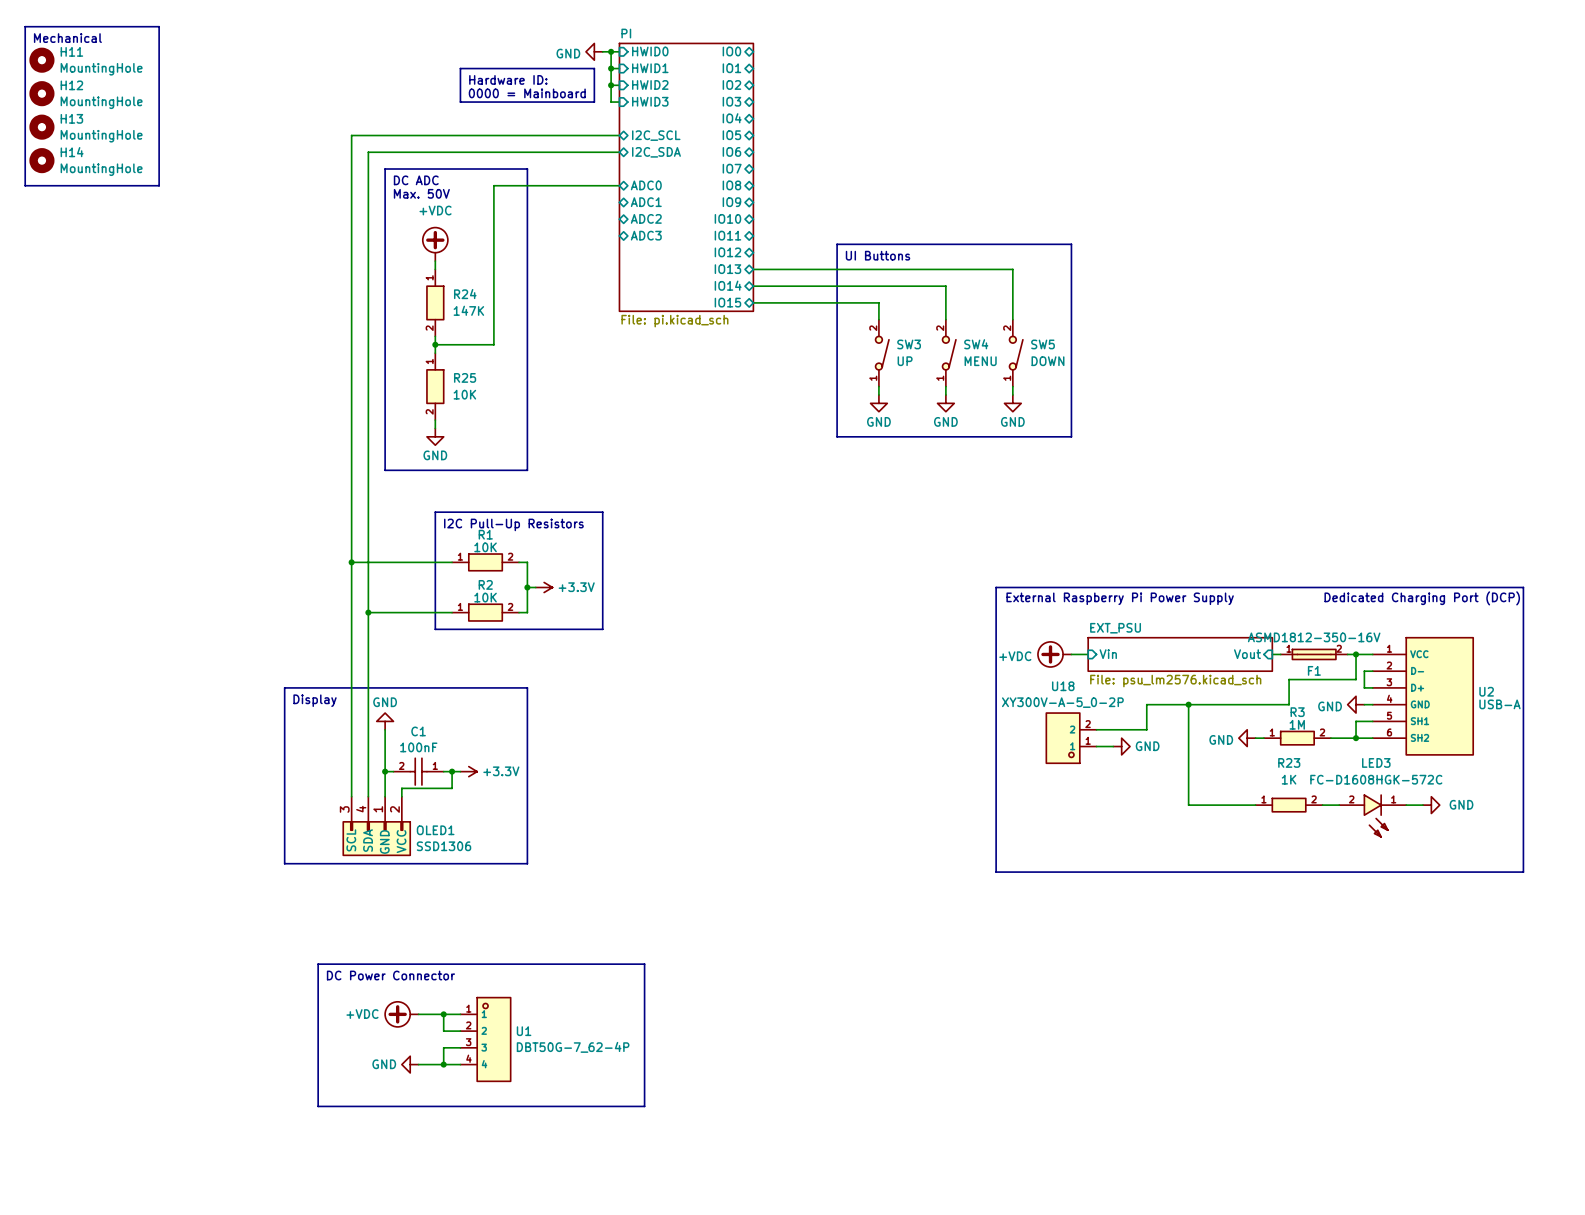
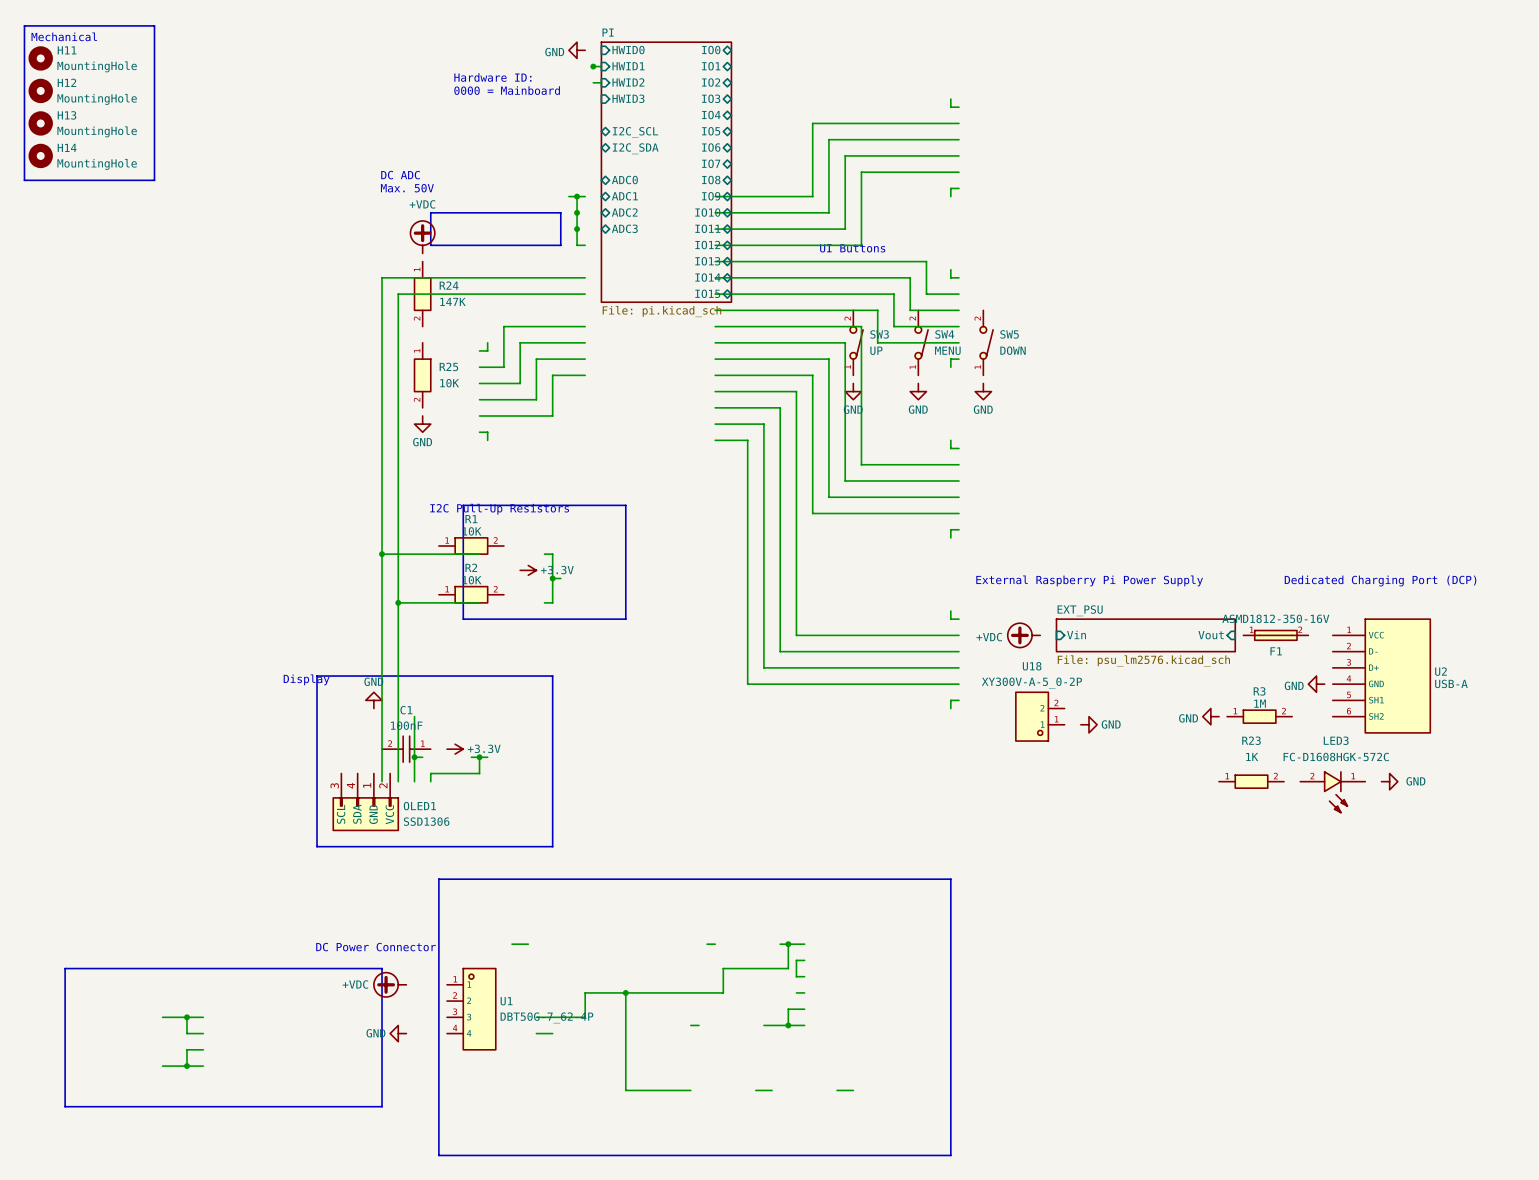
wire: (602, 51) (619, 51) -> (568, 196) (585, 196)
wire: (611, 51) (611, 102) (619, 102) -> (577, 196) (577, 245) (585, 245)
junction: (611, 51) -> none
line: (460, 68) (594, 68) (594, 102) (460, 102) (460, 68) -> (430, 212) (560, 212) (560, 245) (430, 245) (430, 212)
junction: (611, 85) -> none
wire: none -> (950, 99) (950, 107) (958, 107)
wire: none -> (958, 123) (812, 123) (812, 196) (715, 196)
wire: (619, 135) (351, 135) (351, 796) -> none
wire: none -> (958, 139) (828, 139) (828, 212) (715, 212)
wire: (619, 152) (368, 152) (368, 796) -> none
wire: none -> (958, 155) (845, 155) (845, 229) (715, 229)
line: (385, 169) (527, 169) (527, 470) (385, 470) (385, 169) -> none
wire: none -> (958, 172) (861, 172) (861, 245) (715, 245)
wire: (619, 185) (493, 185) (493, 344) (435, 344) -> none
wire: none -> (958, 188) (950, 188) (950, 196)
junction: none -> (577, 196)
junction: none -> (577, 212)
junction: none -> (577, 229)
line: (837, 244) (1071, 244) (1071, 436) (837, 436) (837, 244) -> none
wire: (435, 261) (435, 269) -> none
wire: none -> (715, 261) (731, 261)
wire: (954, 269) (1012, 269) (1012, 319) -> (926, 261) (926, 294) (958, 294)
wire: none -> (950, 269) (950, 277) (958, 277)
wire: none -> (585, 277) (382, 277) (382, 781)
wire: none -> (715, 277) (731, 277)
wire: (937, 286) (945, 286) (945, 319) -> (910, 277) (910, 310) (958, 310)
wire: none -> (585, 294) (398, 294) (398, 781)
wire: none -> (715, 294) (731, 294)
wire: (878, 302) (878, 319) -> (853, 294) (893, 294) (893, 326) (958, 326)
wire: none -> (715, 310) (877, 310) (877, 342) (958, 342)
wire: (435, 336) (435, 353) -> none
wire: none -> (585, 326) (503, 326) (503, 367) (479, 367)
wire: none -> (715, 326) (861, 326) (861, 464) (958, 464)
junction: (435, 344) -> none
wire: none -> (487, 342) (487, 350) (479, 350)
wire: none -> (585, 342) (520, 342) (520, 383) (479, 383)
wire: none -> (715, 342) (845, 342) (845, 480) (958, 480)
wire: none -> (585, 359) (536, 359) (536, 399) (479, 399)
wire: none -> (715, 359) (828, 359) (828, 497) (958, 497)
wire: none -> (958, 359) (950, 359) (950, 367)
wire: none -> (585, 375) (552, 375) (552, 415) (479, 415)
wire: none -> (715, 375) (812, 375) (812, 513) (958, 513)
wire: (878, 386) (878, 394) -> none
wire: (945, 386) (945, 394) -> none
wire: (1012, 386) (1012, 394) -> none
wire: none -> (715, 391) (796, 391) (796, 635) (958, 635)
wire: (435, 420) (435, 428) -> none
wire: none -> (715, 407) (780, 407) (780, 651) (958, 651)
wire: none -> (715, 424) (763, 424) (763, 667) (958, 667)
wire: none -> (479, 432) (487, 432) (487, 440)
wire: none -> (715, 440) (747, 440) (747, 684) (958, 684)
wire: none -> (950, 440) (950, 448) (958, 448)
line: (435, 512) (602, 512) (602, 629) (435, 629) (435, 512) -> (463, 505) (625, 505) (625, 619) (463, 619) (463, 505)
wire: none -> (958, 529) (950, 529) (950, 537)
wire: (351, 562) (452, 562) -> (382, 554) (479, 554)
junction: (351, 562) -> none
wire: (519, 562) (527, 562) (527, 612) (519, 612) -> (544, 554) (552, 554) (552, 602) (544, 602)
junction: none -> (382, 554)
wire: (527, 587) (535, 587) -> (552, 578) (560, 578)
junction: (527, 587) -> none
line: (996, 587) (1523, 587) (1523, 872) (996, 872) (996, 587) -> none
junction: none -> (552, 578)
wire: (368, 612) (452, 612) -> (398, 602) (479, 602)
junction: (368, 612) -> none
junction: none -> (398, 602)
wire: none -> (950, 611) (950, 619) (958, 619)
wire: (1071, 654) (1088, 654) -> none
wire: (1272, 654) (1280, 654) -> none
wire: (1347, 654) (1372, 654) -> none
wire: (1356, 654) (1356, 679) (1289, 679) (1289, 704) (1146, 704) (1146, 729) (1096, 729) -> none
junction: (1356, 654) -> none
wire: (1372, 671) (1364, 671) (1364, 687) (1372, 687) -> none
line: (284, 687) (527, 687) (527, 863) (284, 863) (284, 687) -> (317, 676) (552, 676) (552, 846) (317, 846) (317, 676)
wire: (1188, 704) (1188, 805) (1255, 805) -> none
junction: (1188, 704) -> none
wire: (1364, 704) (1372, 704) -> none
wire: none -> (958, 700) (950, 700) (950, 708)
wire: (1372, 721) (1356, 721) (1356, 738) -> none
wire: (385, 729) (385, 796) -> (414, 716) (414, 781)
wire: (1255, 738) (1263, 738) -> none
wire: (1330, 738) (1372, 738) -> none
junction: (1356, 738) -> none
wire: (1096, 746) (1113, 746) -> none
wire: (385, 771) (393, 771) -> (414, 757) (422, 757)
junction: (385, 771) -> none
wire: (443, 771) (460, 771) -> (471, 757) (487, 757)
wire: (452, 771) (452, 788) (401, 788) (401, 796) -> (479, 757) (479, 773) (430, 773) (430, 781)
junction: (452, 771) -> none
junction: none -> (414, 757)
junction: none -> (479, 757)
wire: (1322, 805) (1339, 805) -> none
wire: (1406, 805) (1422, 805) -> none
line: none -> (438, 879) (950, 879) (950, 1155) (438, 1155) (438, 879)
line: (318, 964) (644, 964) (644, 1106) (318, 1106) (318, 964) -> none
wire: none -> (512, 944) (528, 944)
wire: none -> (707, 944) (715, 944)
wire: none -> (780, 944) (804, 944)
wire: none -> (788, 944) (788, 968) (723, 968) (723, 992) (585, 992) (585, 1017) (536, 1017)
junction: none -> (788, 944)
wire: none -> (804, 960) (796, 960) (796, 976) (804, 976)
line: none -> (65, 968) (382, 968) (382, 1106) (65, 1106) (65, 968)
wire: (418, 1014) (460, 1014) -> none
wire: (443, 1014) (443, 1031) (460, 1031) -> none
junction: (443, 1014) -> none
wire: none -> (625, 992) (625, 1090) (690, 1090)
junction: none -> (625, 992)
wire: none -> (796, 992) (804, 992)
wire: none -> (804, 1009) (788, 1009) (788, 1025)
wire: none -> (162, 1017) (203, 1017)
wire: none -> (186, 1017) (186, 1033) (203, 1033)
junction: none -> (186, 1017)
wire: (460, 1047) (443, 1047) (443, 1064) -> none
wire: none -> (690, 1025) (698, 1025)
wire: none -> (763, 1025) (804, 1025)
junction: none -> (788, 1025)
wire: (418, 1064) (460, 1064) -> none
junction: (443, 1064) -> none
wire: none -> (536, 1033) (552, 1033)
wire: none -> (203, 1049) (186, 1049) (186, 1066)
wire: none -> (162, 1066) (203, 1066)
junction: none -> (186, 1066)
wire: none -> (755, 1090) (772, 1090)
wire: none -> (837, 1090) (853, 1090)

